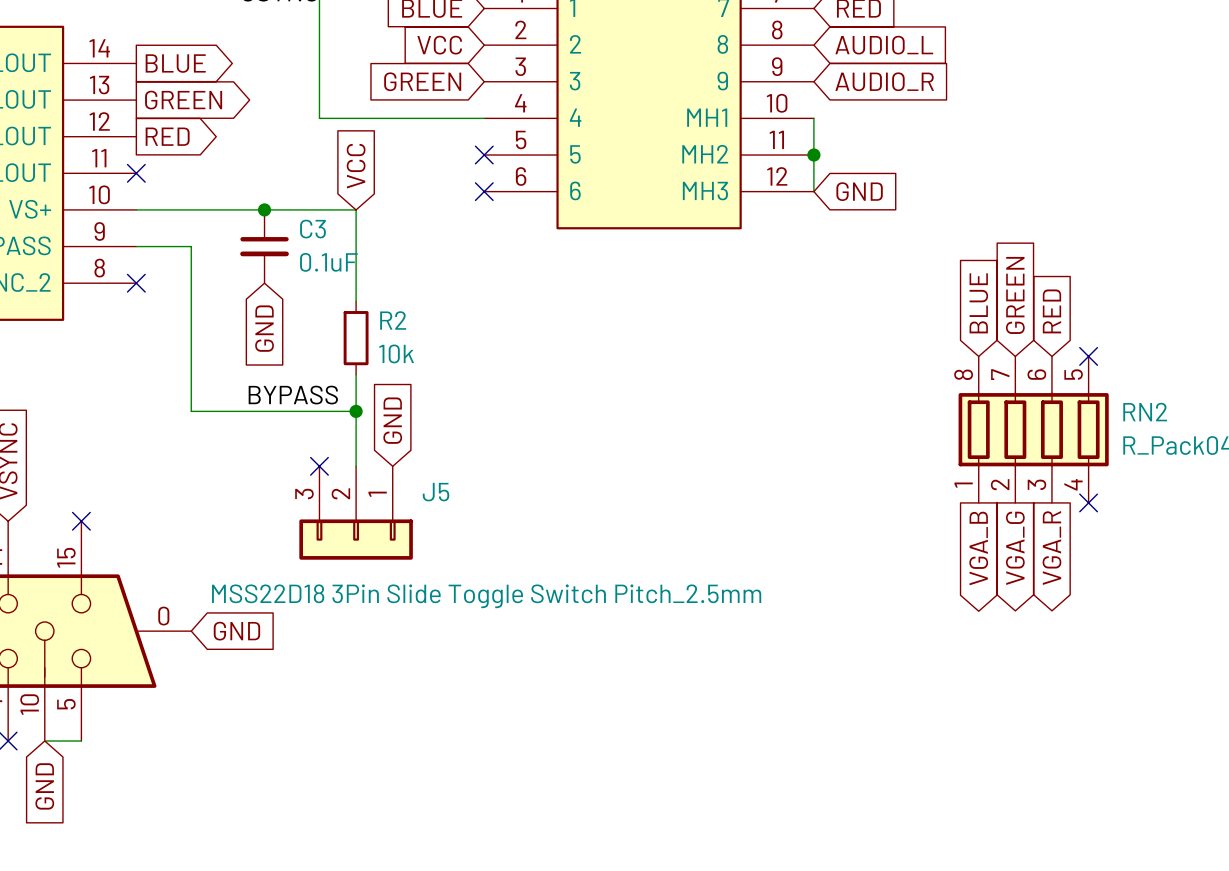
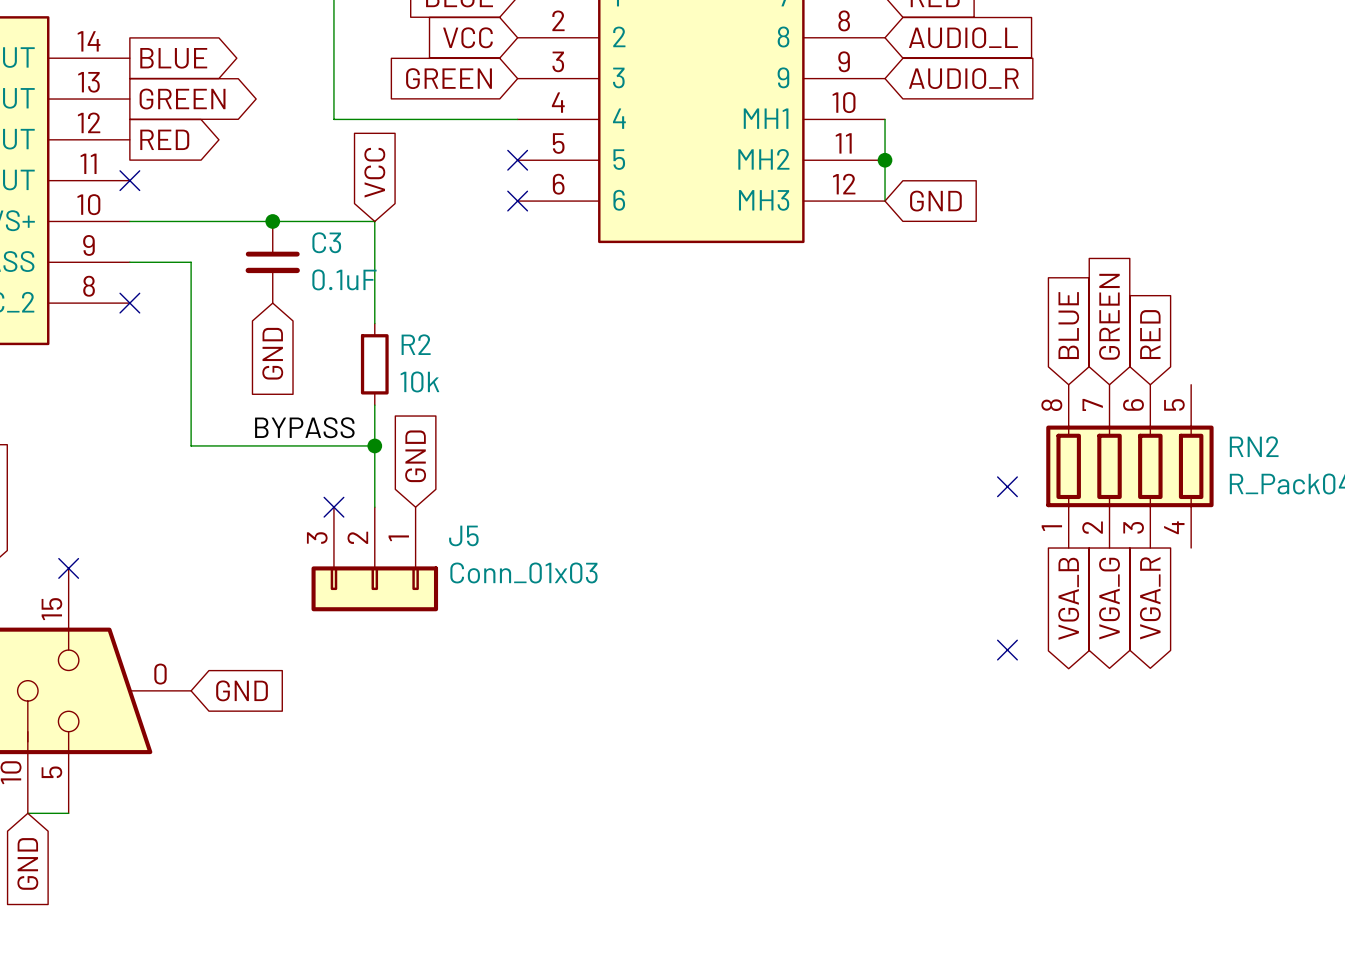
no-connect mark: (1088, 356) -> none
no-connect mark: none -> (1007, 486)
no-connect mark: (1088, 502) -> none
no-connect mark: none -> (1007, 650)
J5 value: MSS22D18 3Pin Slide Toggle Switch Pitch_2.5mm (486, 596) -> Conn_01x03 (523, 572)

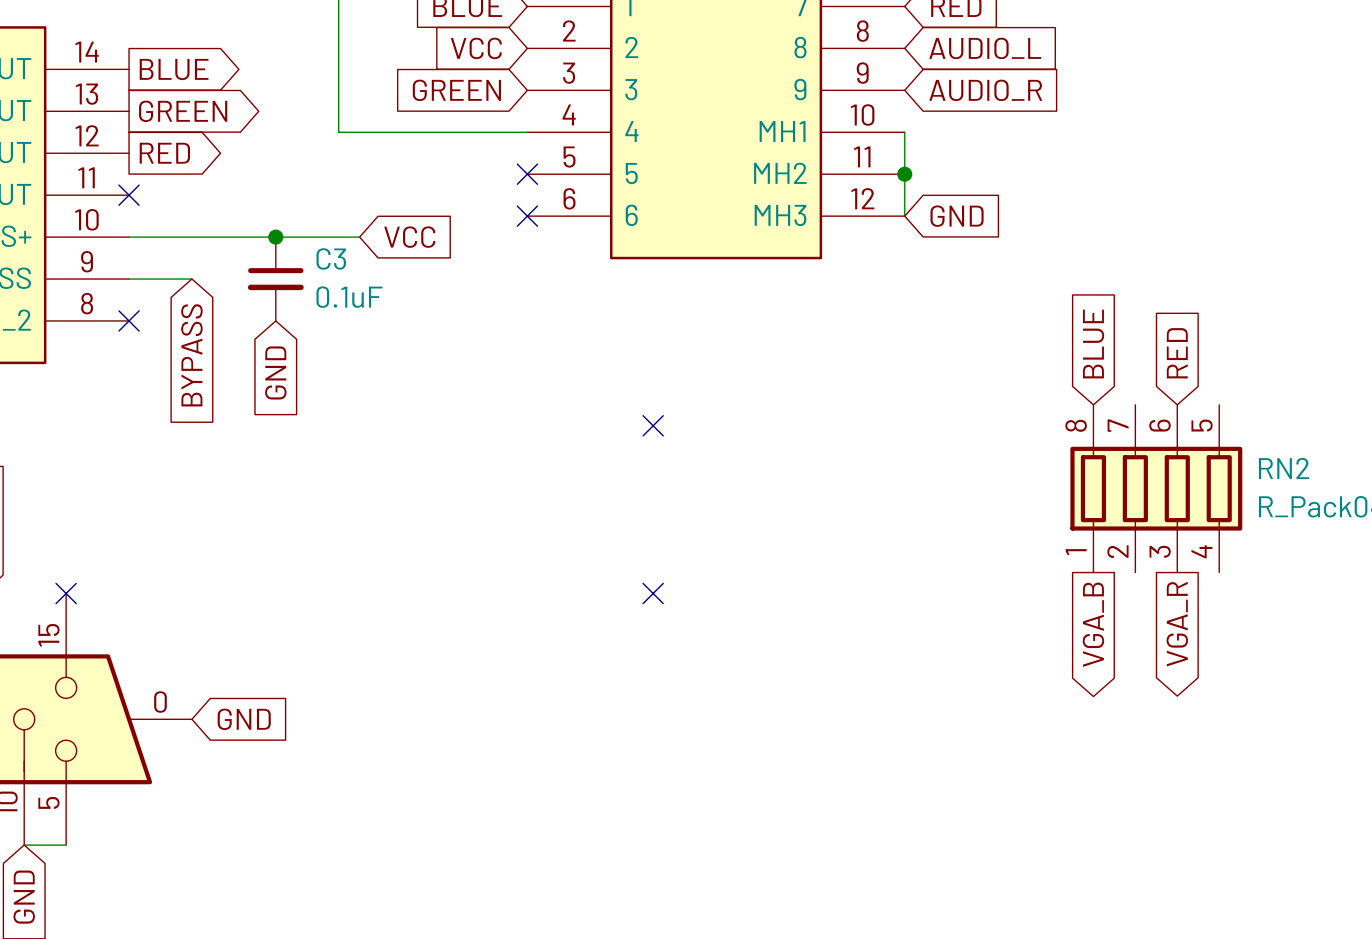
global label rotation: 0° (374, 172) -> 90° clockwise (409, 237)
wire: (354, 221) (374, 221) (374, 323) -> none
wire: (191, 262) (191, 445) (374, 445) -> none
global label: GREEN (1109, 316) -> none
global label: none -> BYPASS (191, 355)
R2: 10k (374, 364) -> none
wire: (374, 405) (374, 507) -> none
no-connect mark: none -> (653, 425)
label: BYPASS (304, 427) -> none
junction: (374, 445) -> none
global label: GND (415, 456) -> none
no-connect mark: (1007, 486) -> none
no-connect mark: (333, 507) -> none
J5: Conn_01x03 (374, 559) -> none
no-connect mark: none -> (653, 593)
global label: VGA_G (1109, 598) -> none
no-connect mark: (1007, 650) -> none

